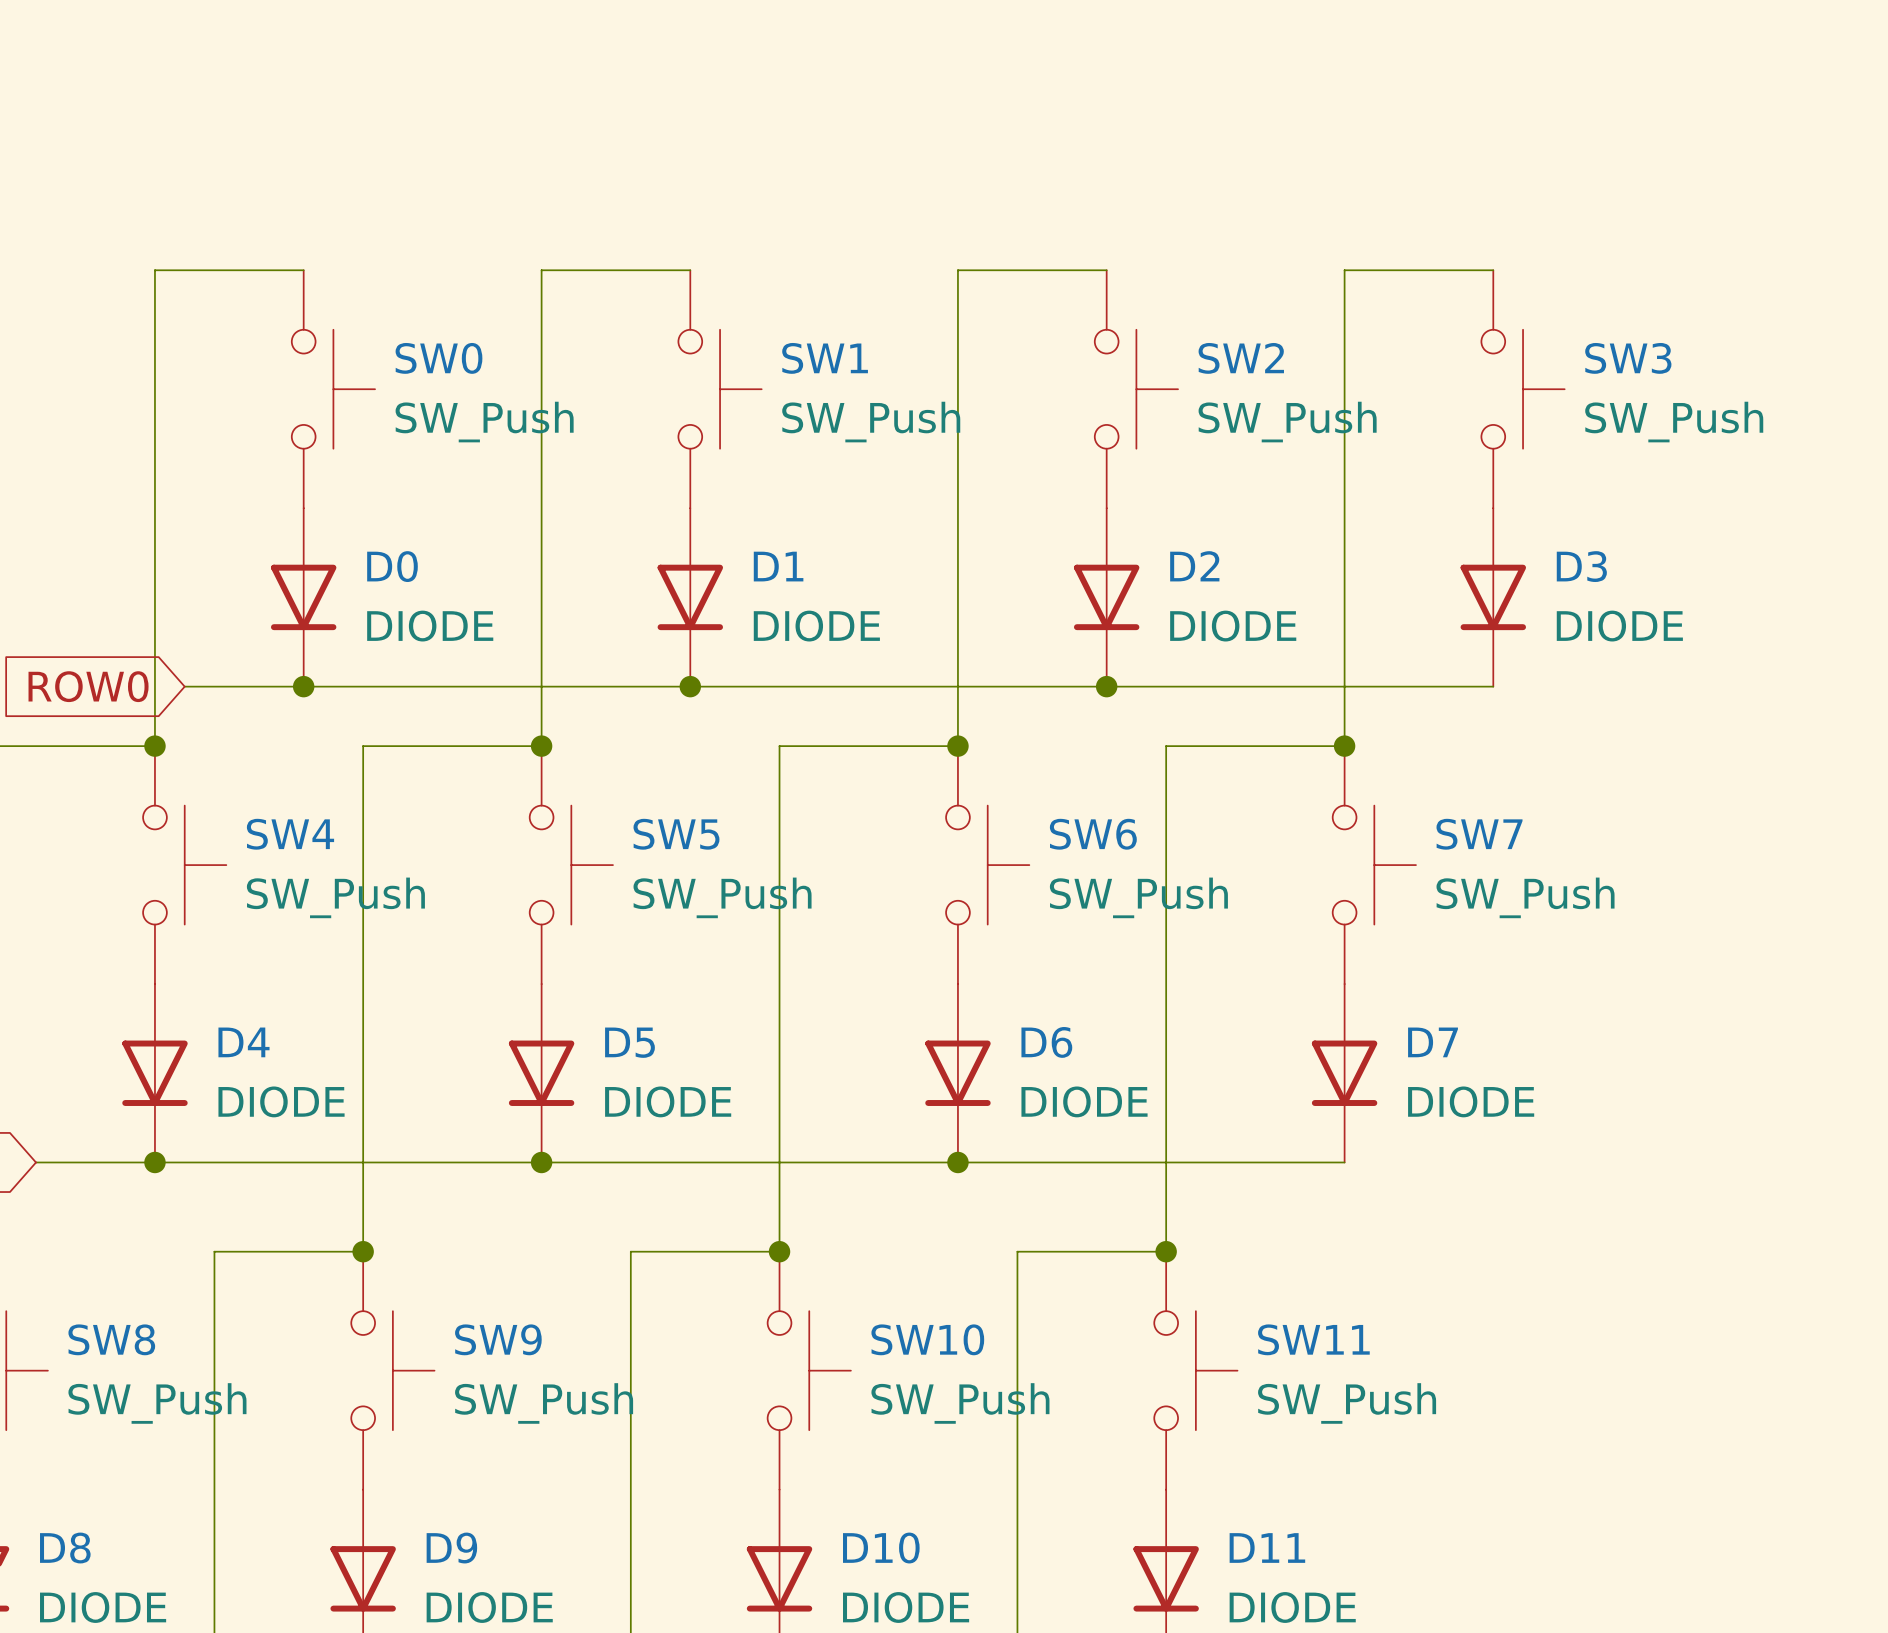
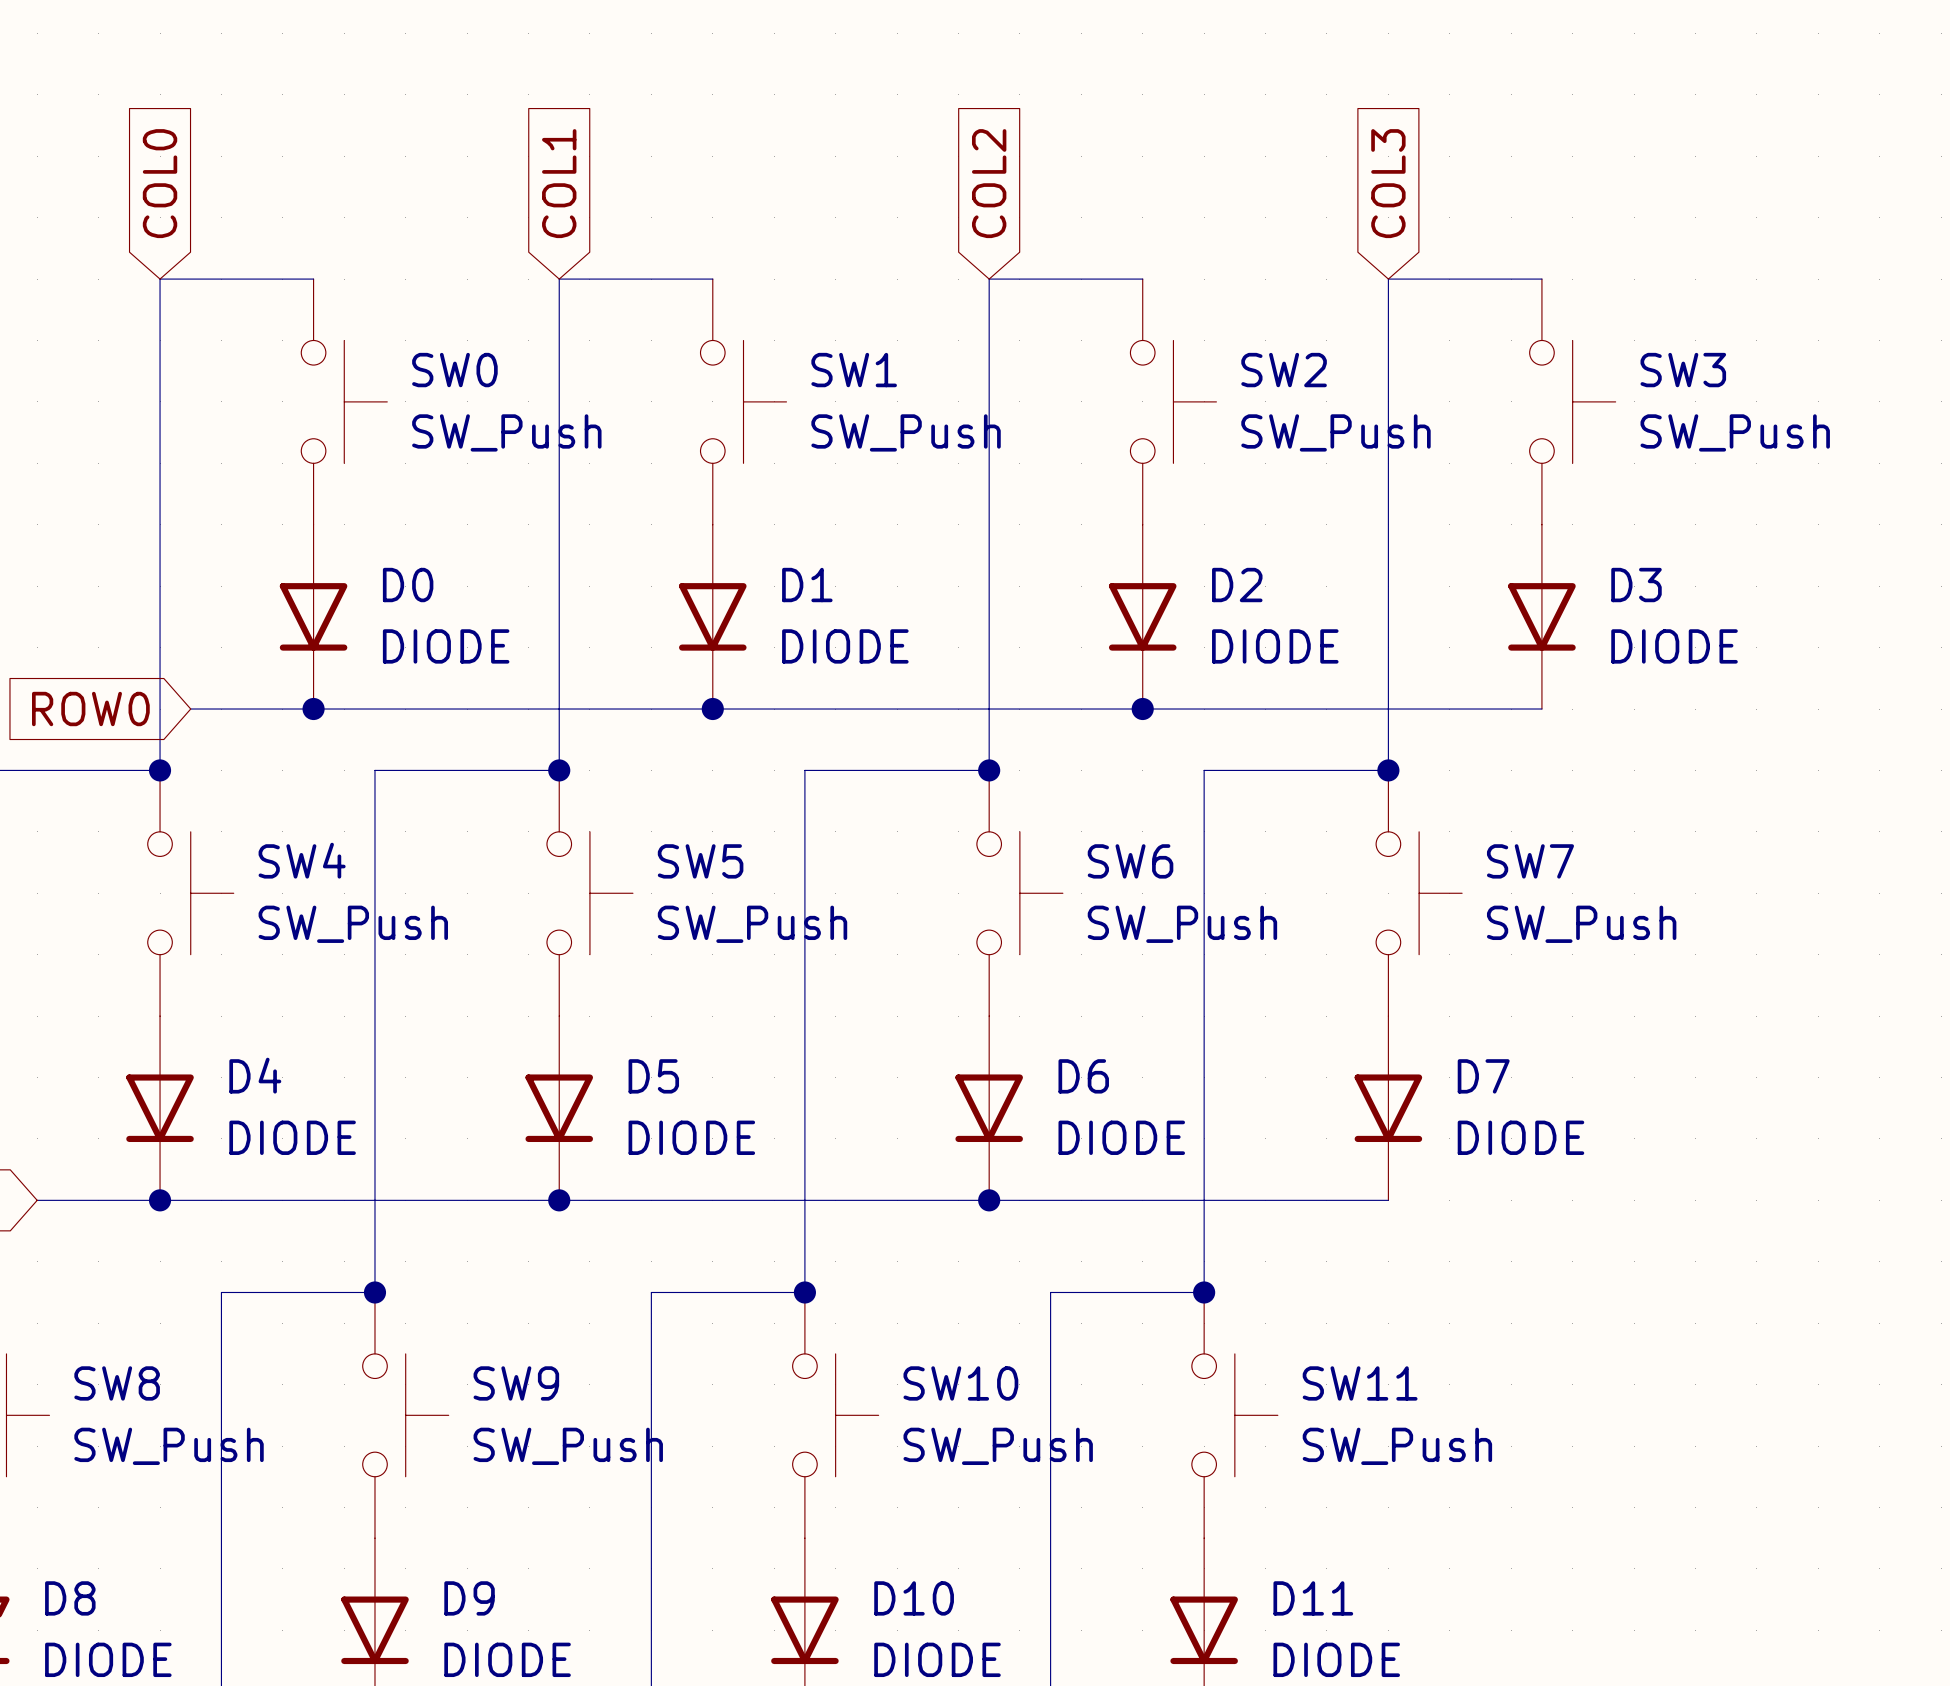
global label: none -> COL0 (160, 183)
global label: none -> COL1 (559, 183)
global label: none -> COL3 (1388, 183)
global label: none -> COL2 (989, 183)

